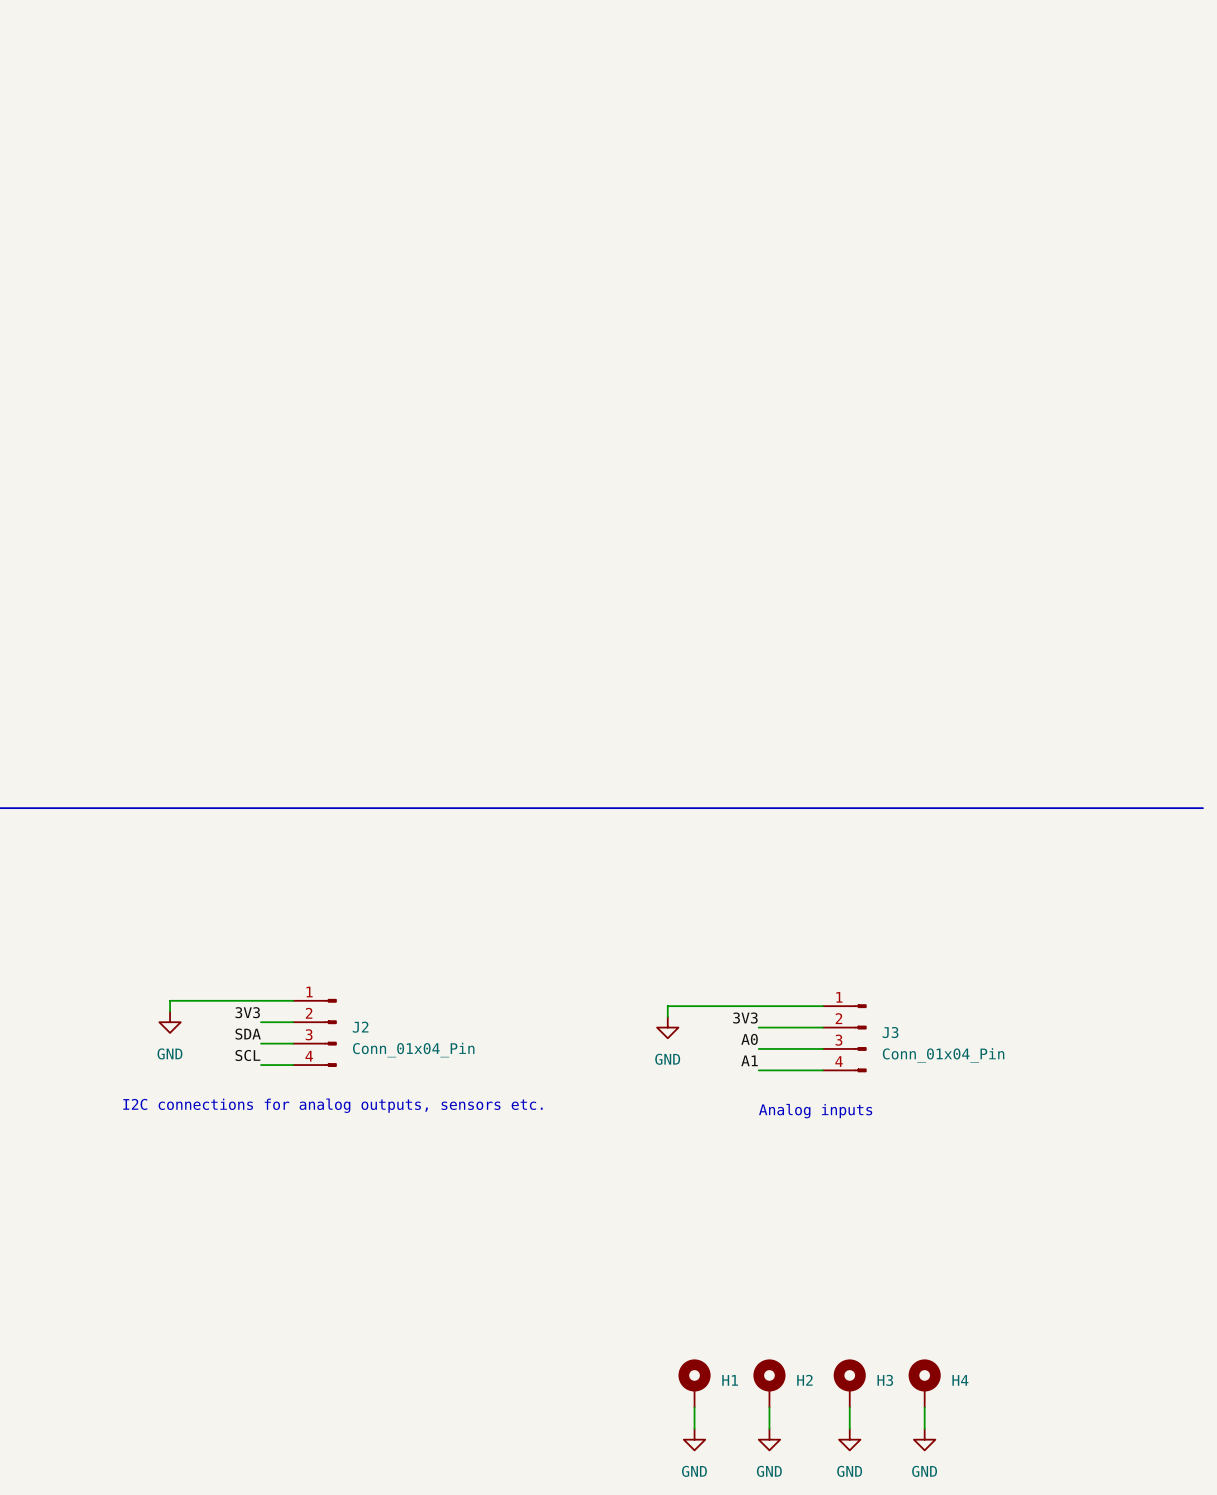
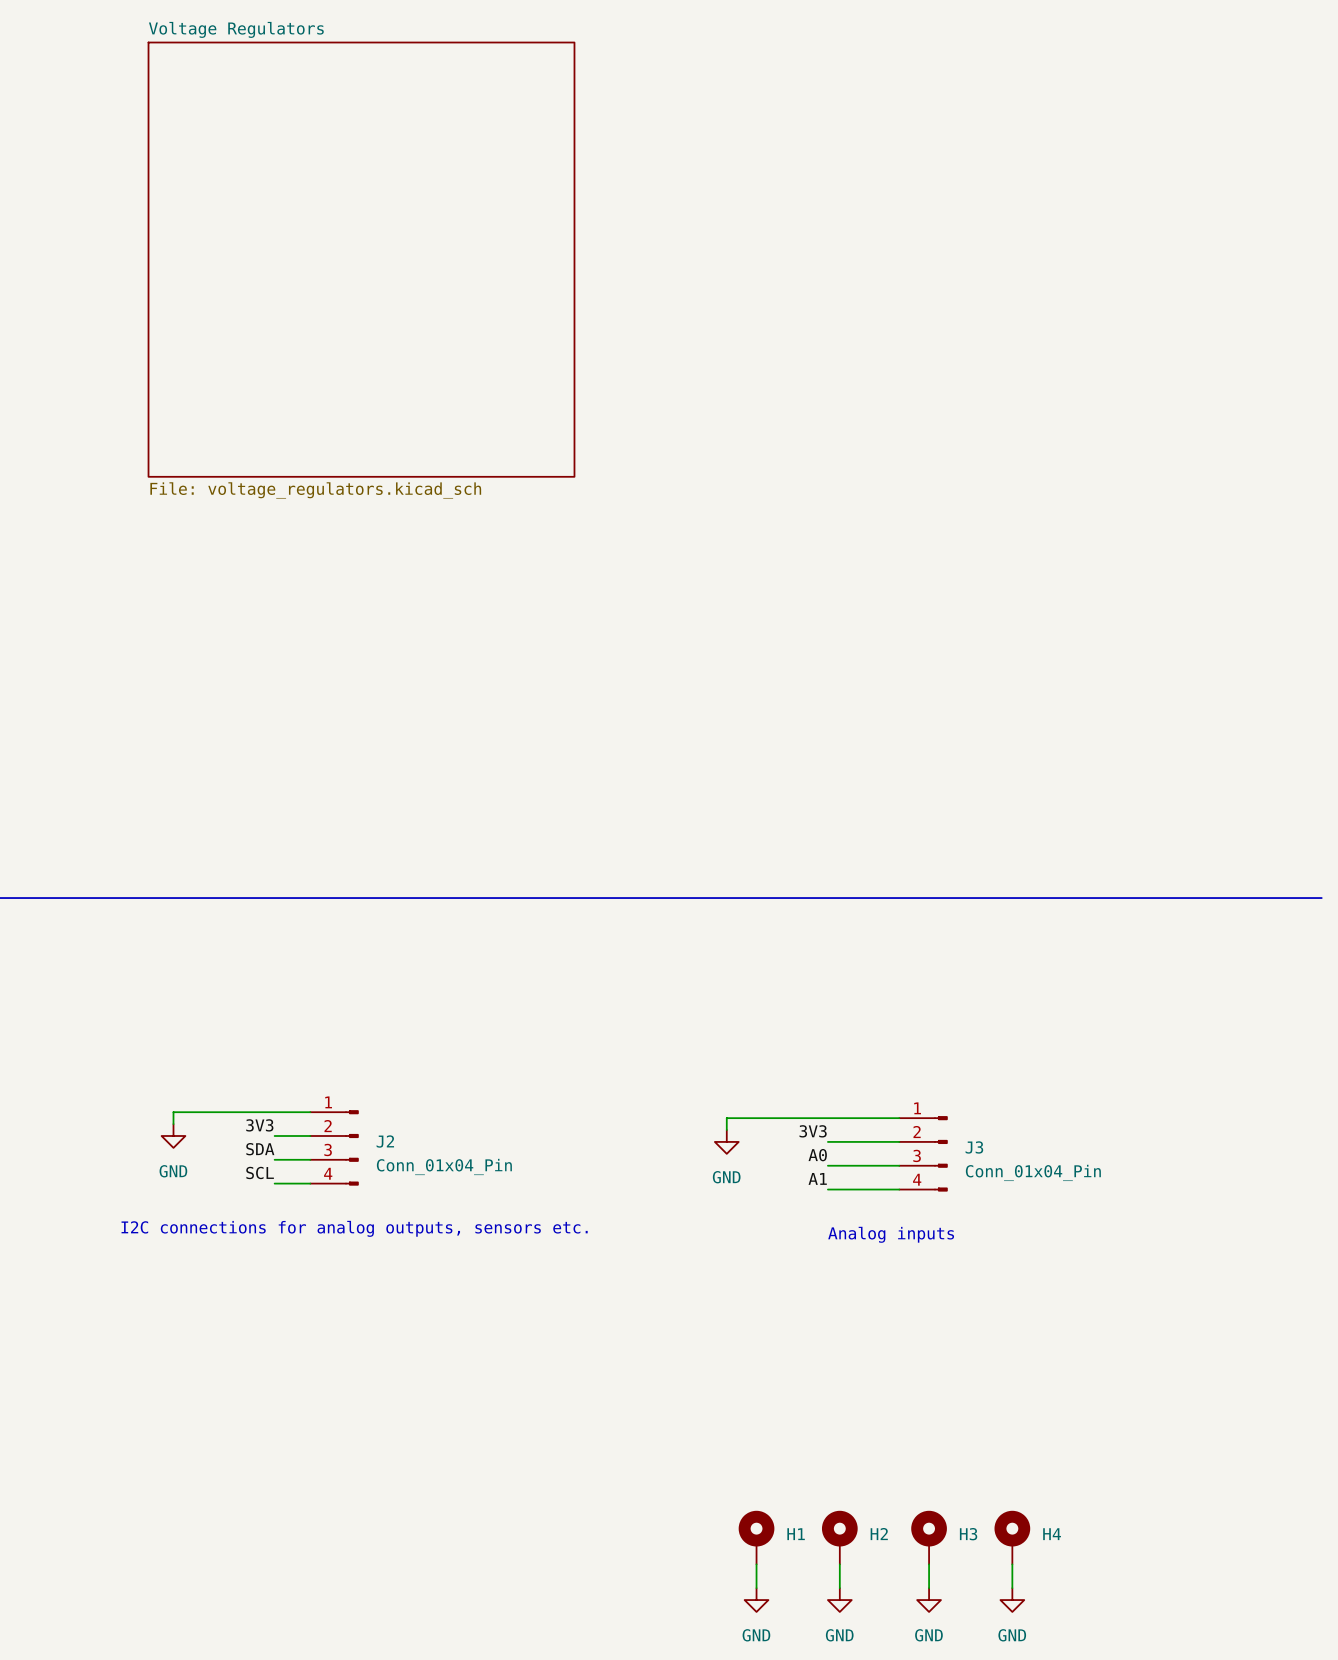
sheet Voltage Regulators: none -> File: voltage_regulators.kicad_sch (361, 259)

